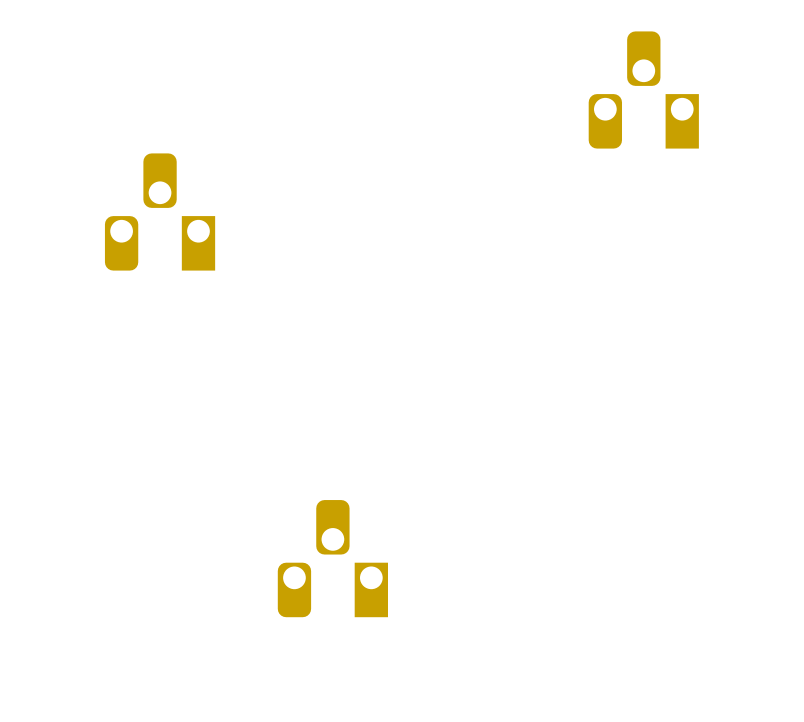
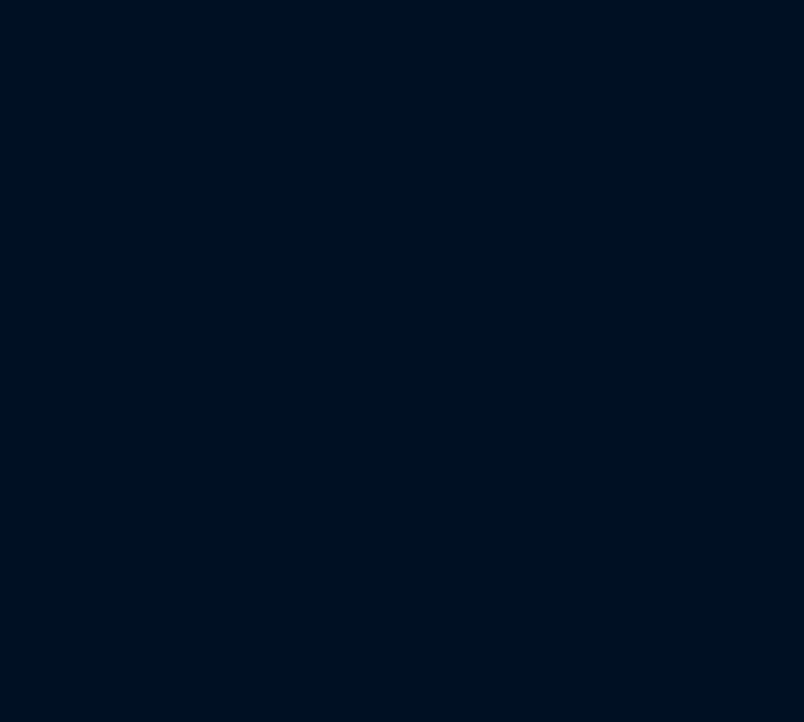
part: (643, 89) -> none
part: (160, 211) -> none
part: (332, 558) -> none

